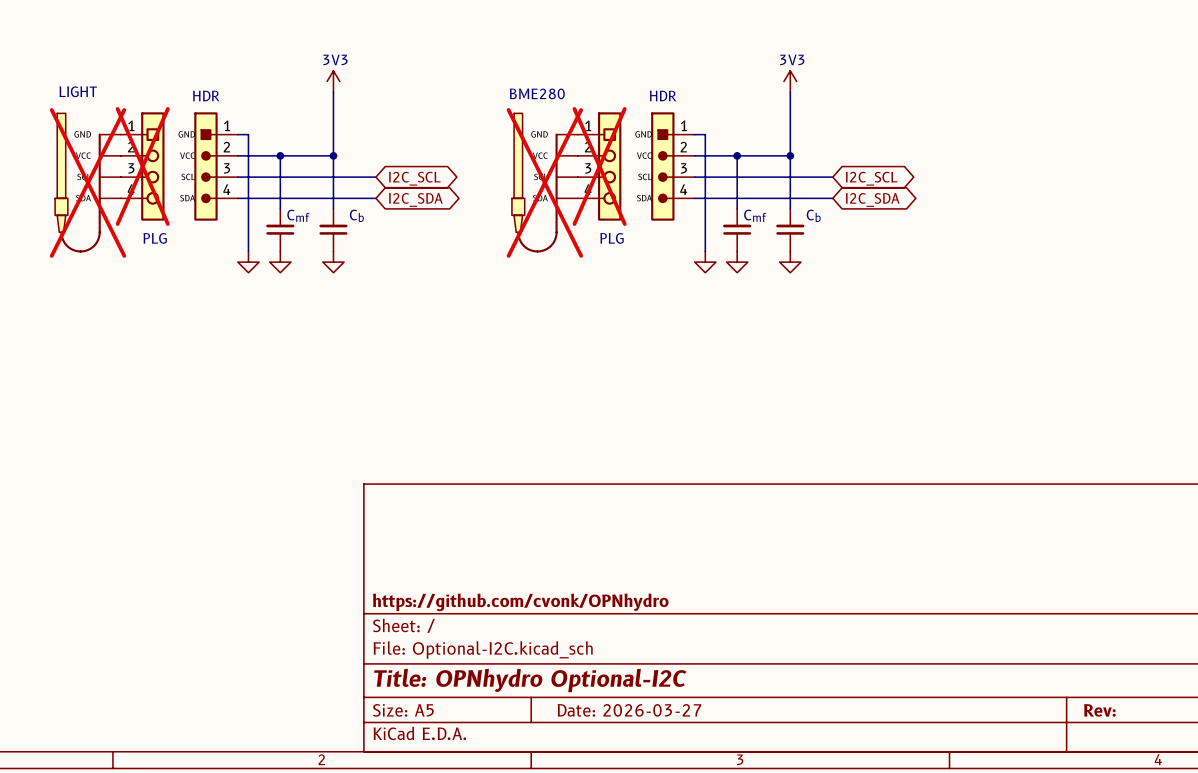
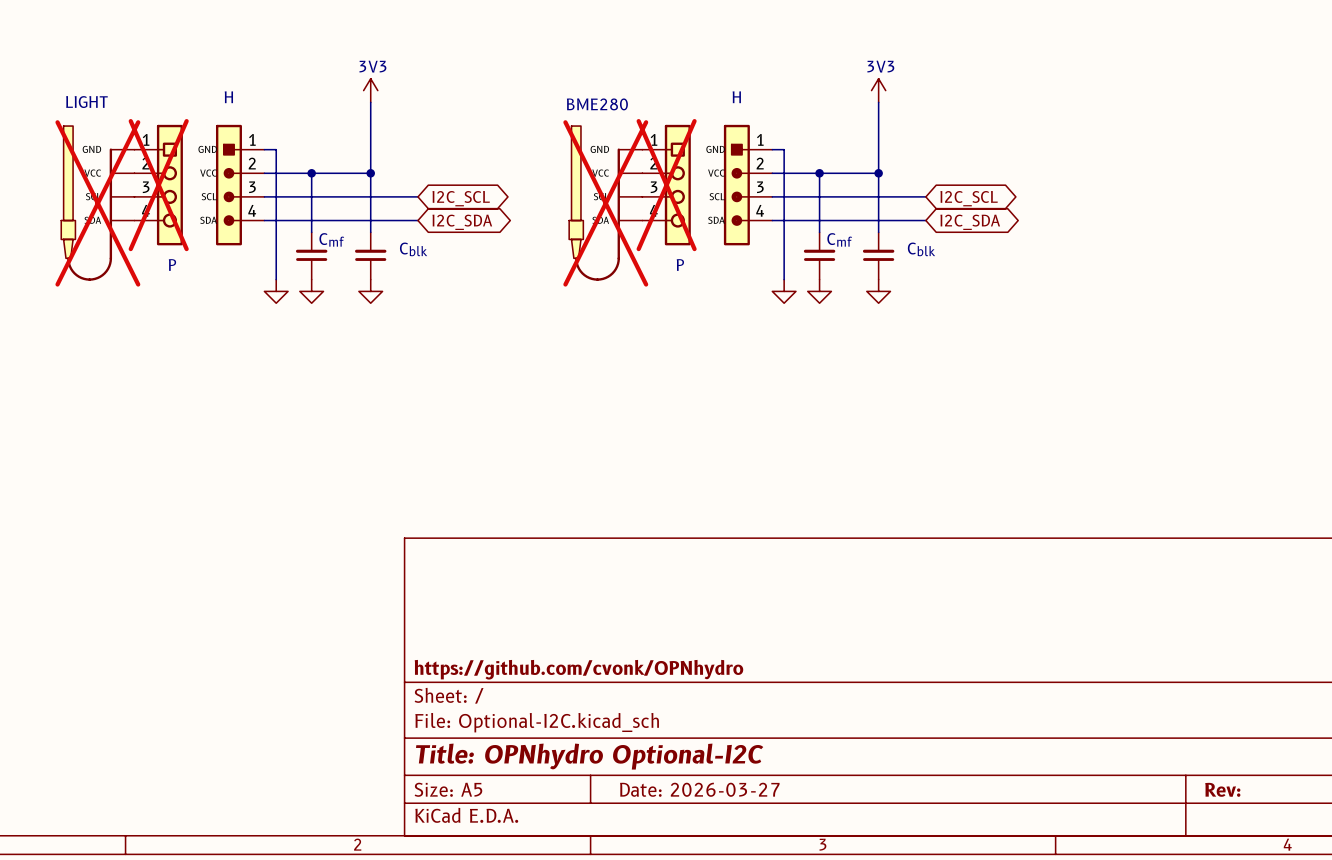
HDR name: HDR (206, 95) -> H (228, 97)
HDR name: HDR (663, 95) -> H (736, 97)
Cb name: Cb (356, 215) -> Cblk (413, 249)
Cb name: Cb (813, 215) -> Cblk (921, 249)
PLG name: PLG (155, 238) -> P (172, 265)
PLG name: PLG (612, 238) -> P (680, 265)

